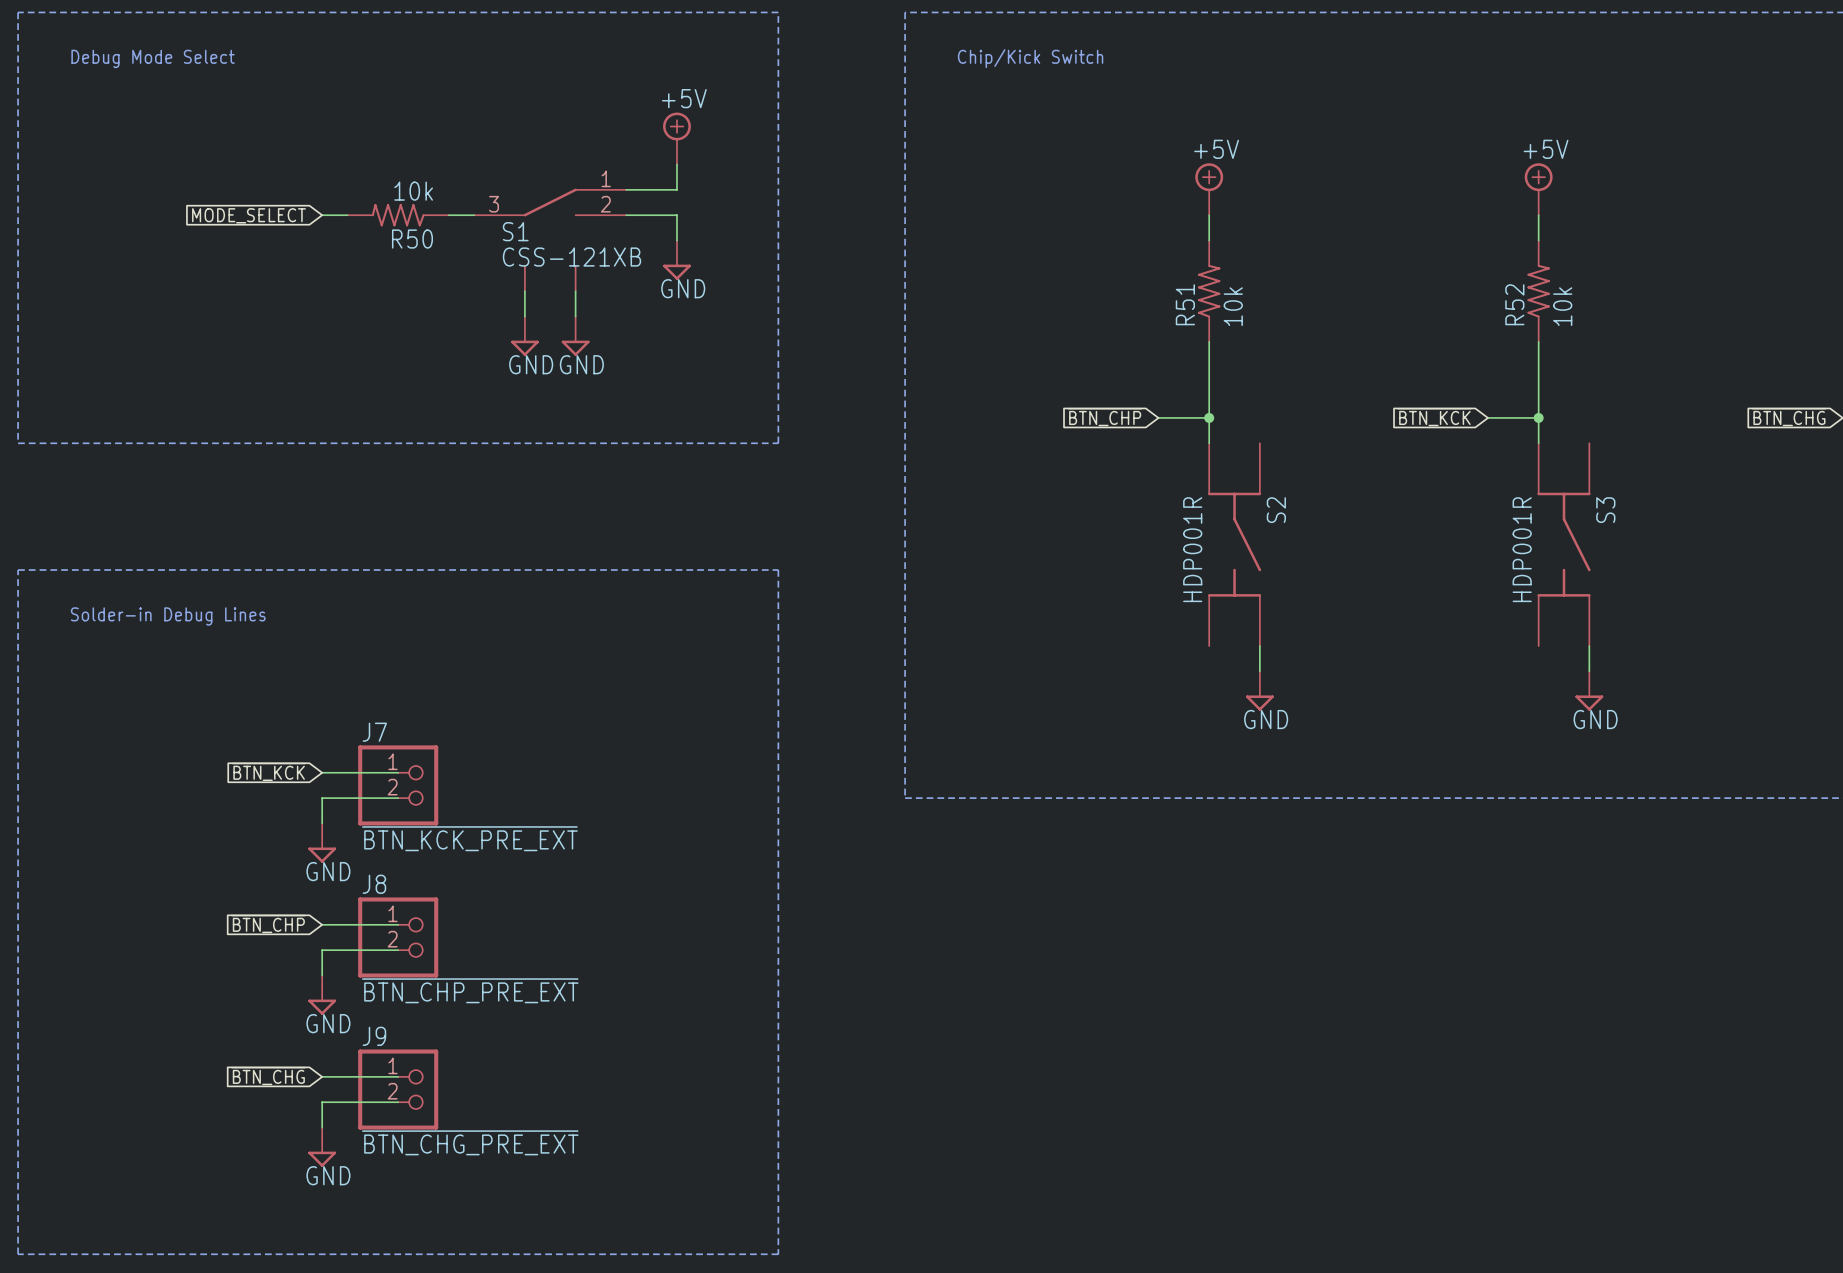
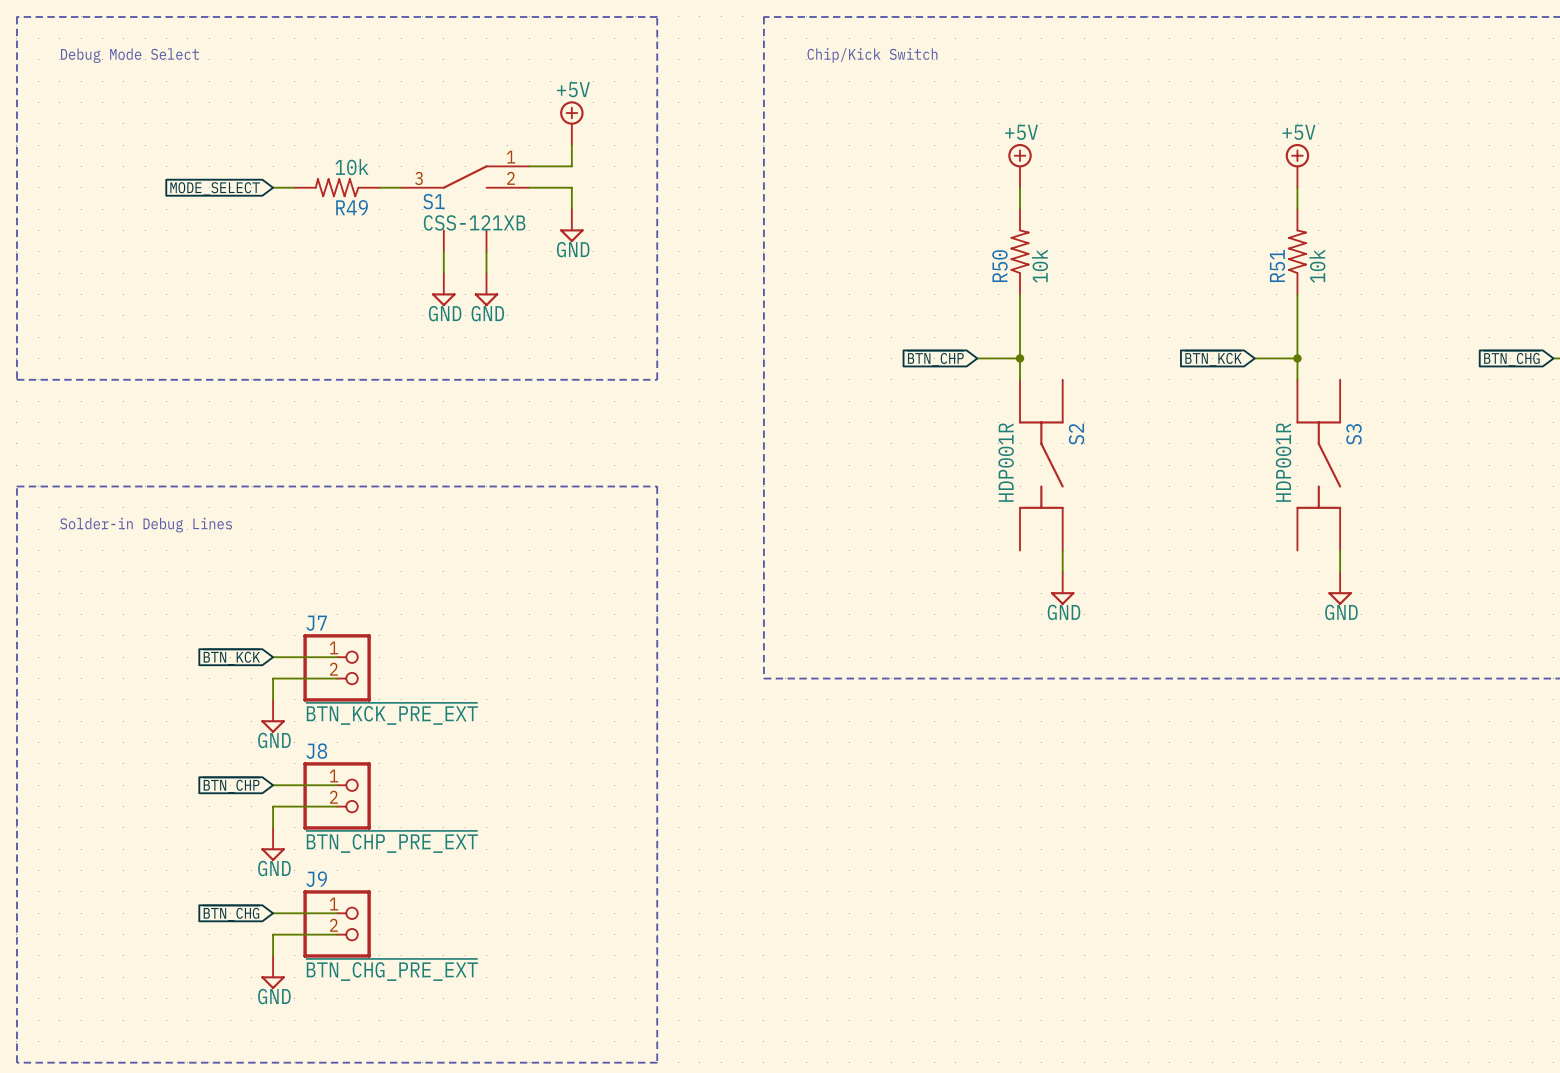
R50 name: R50 (412, 239) -> R49 (352, 207)
R51 name: R51 (1185, 304) -> R50 (999, 266)
R52 name: R52 (1514, 304) -> R51 (1277, 266)

